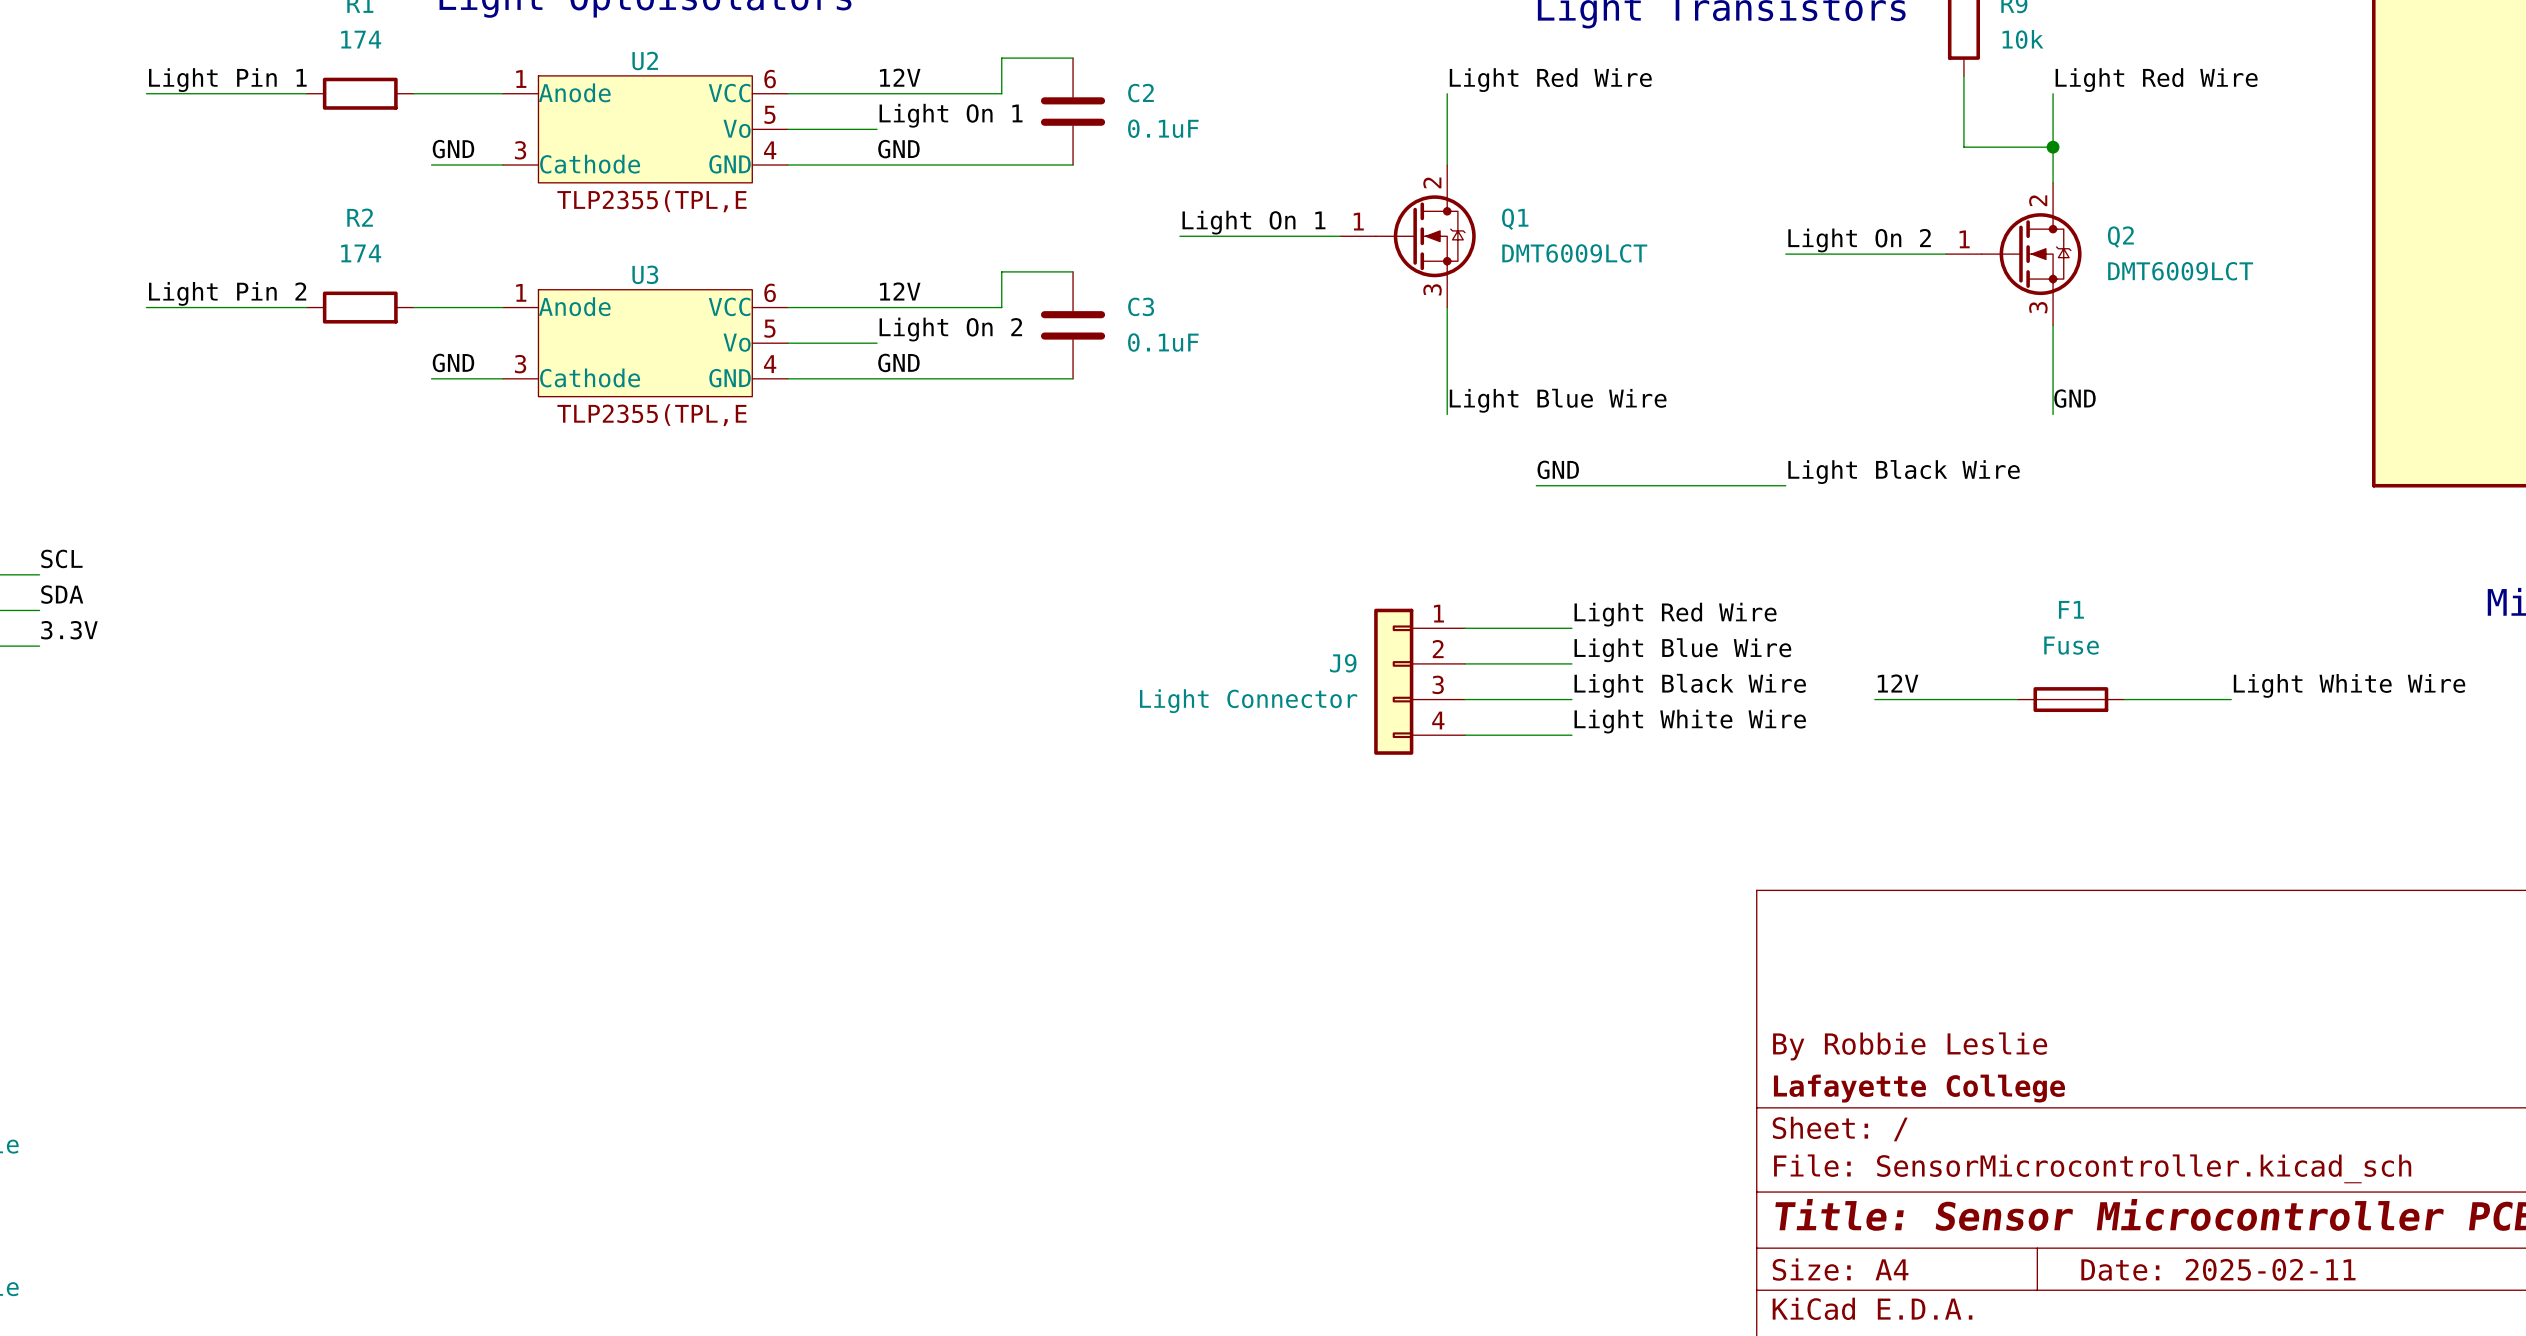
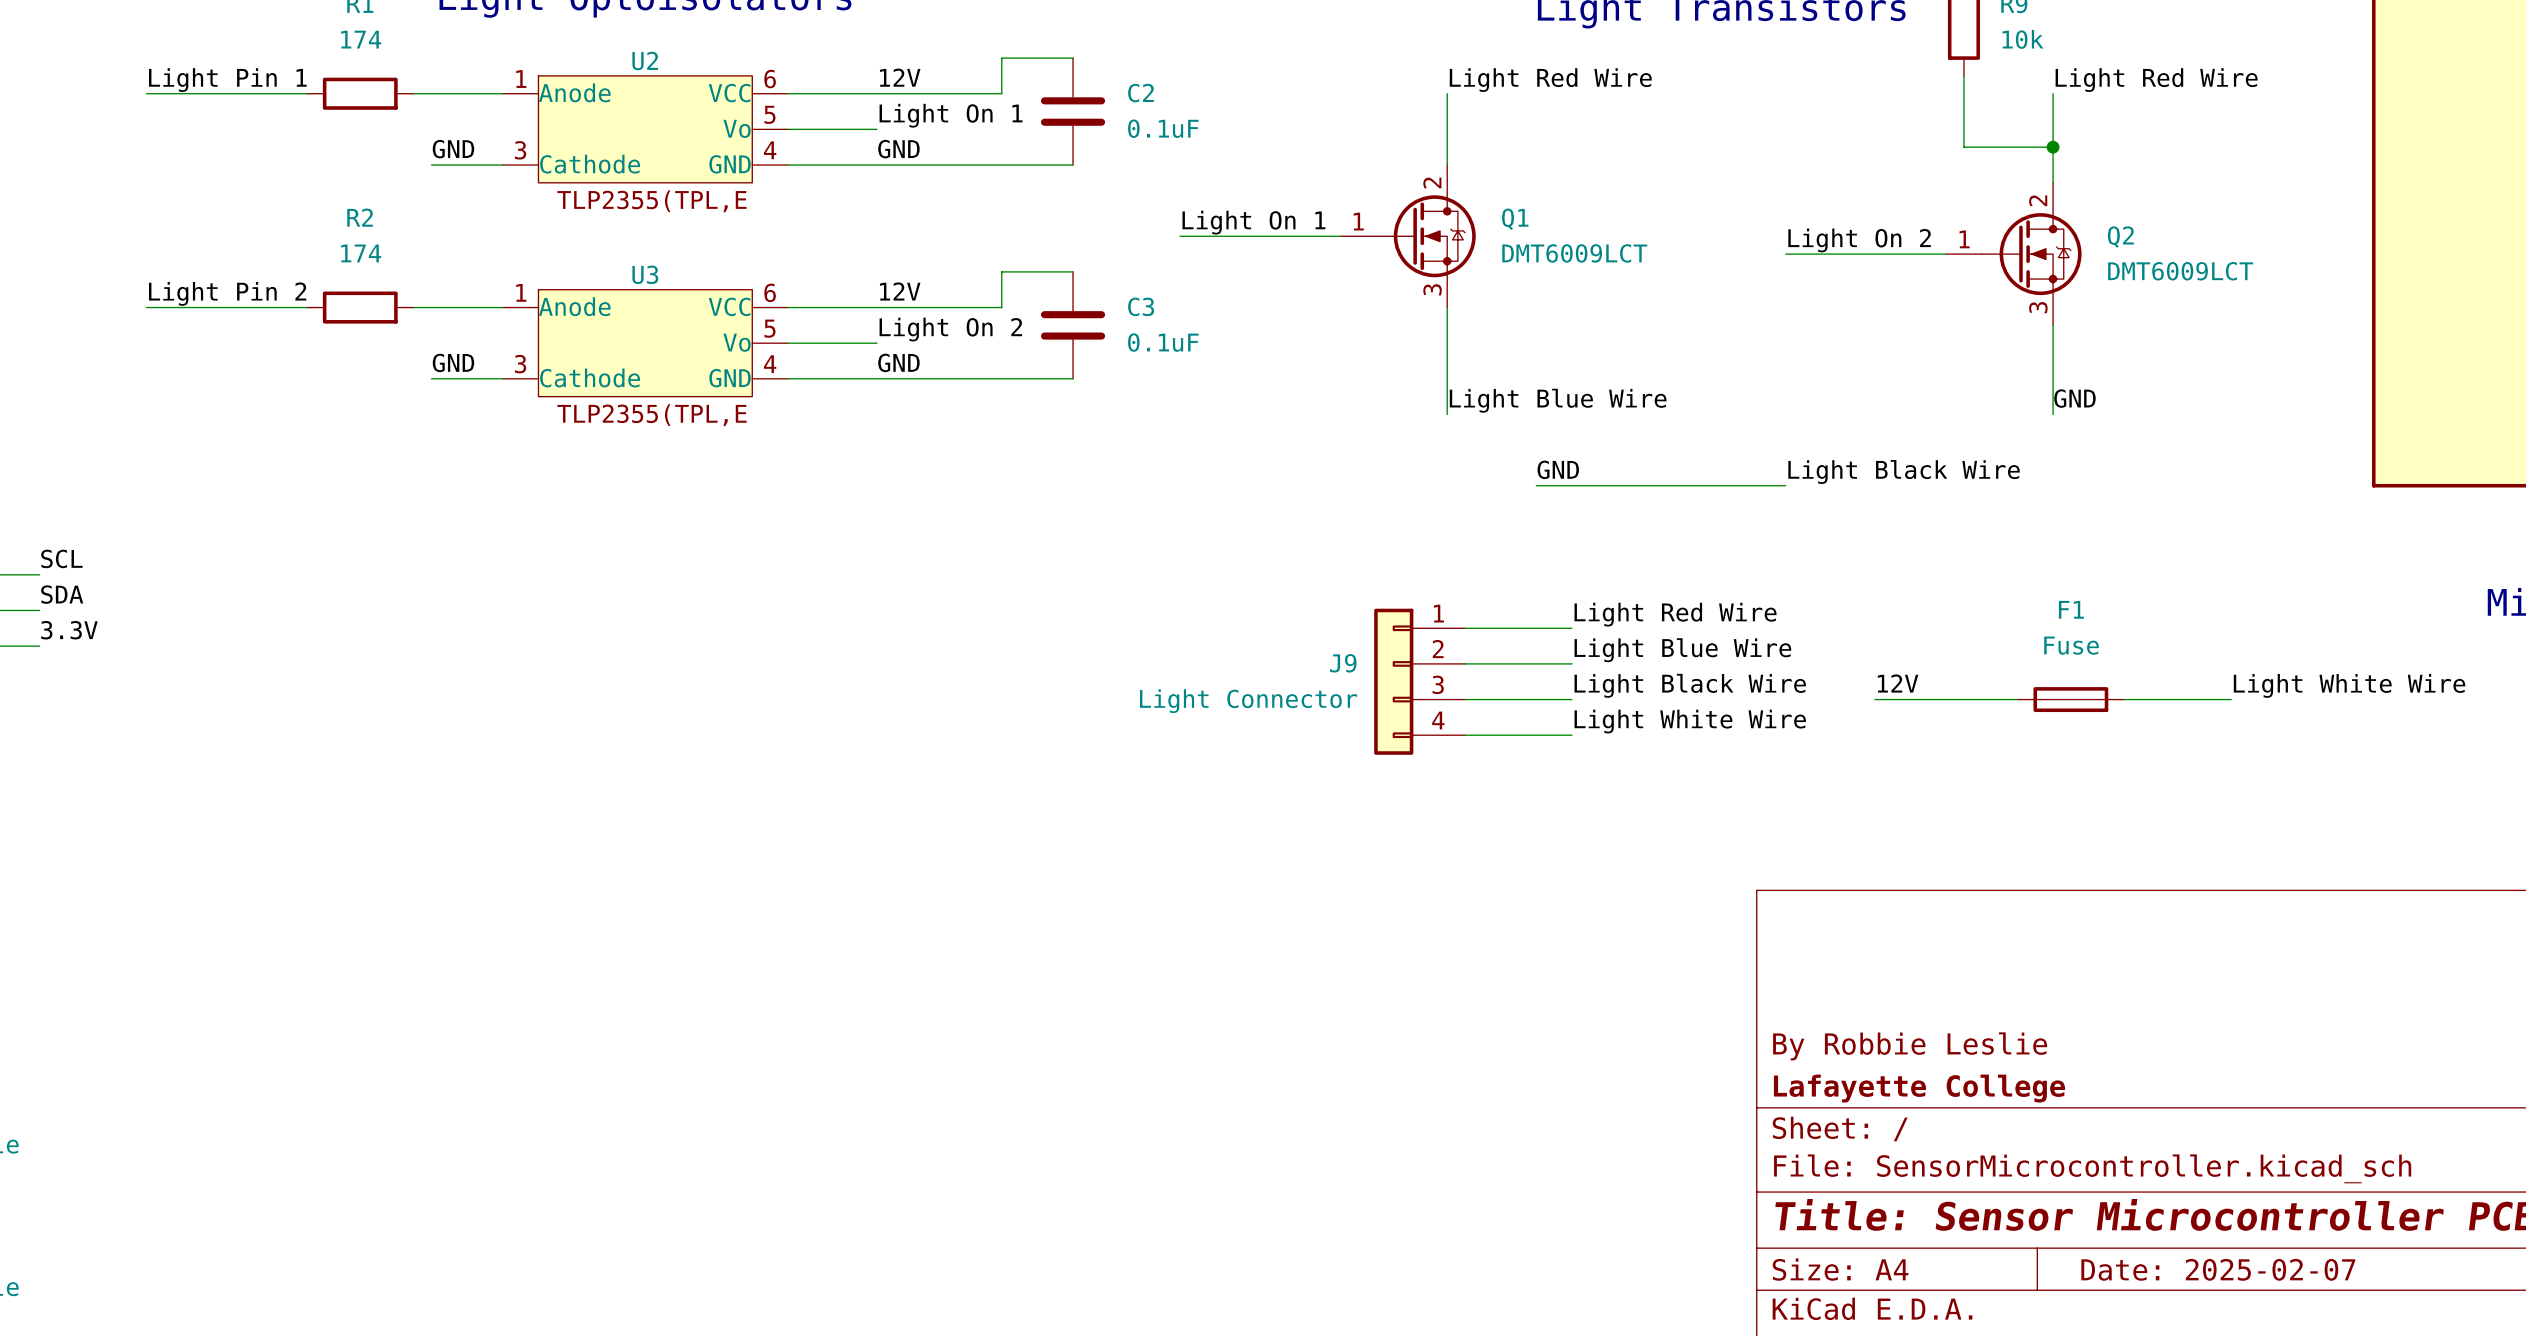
title block: Date: 2025-02-11 (2218, 1269) -> Date: 2025-02-07 (2218, 1269)

